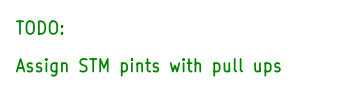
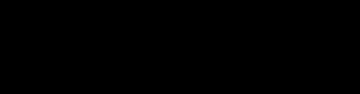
text: TODO: (39, 27) -> none
text: Assign STM pints with pull ups (148, 67) -> none

